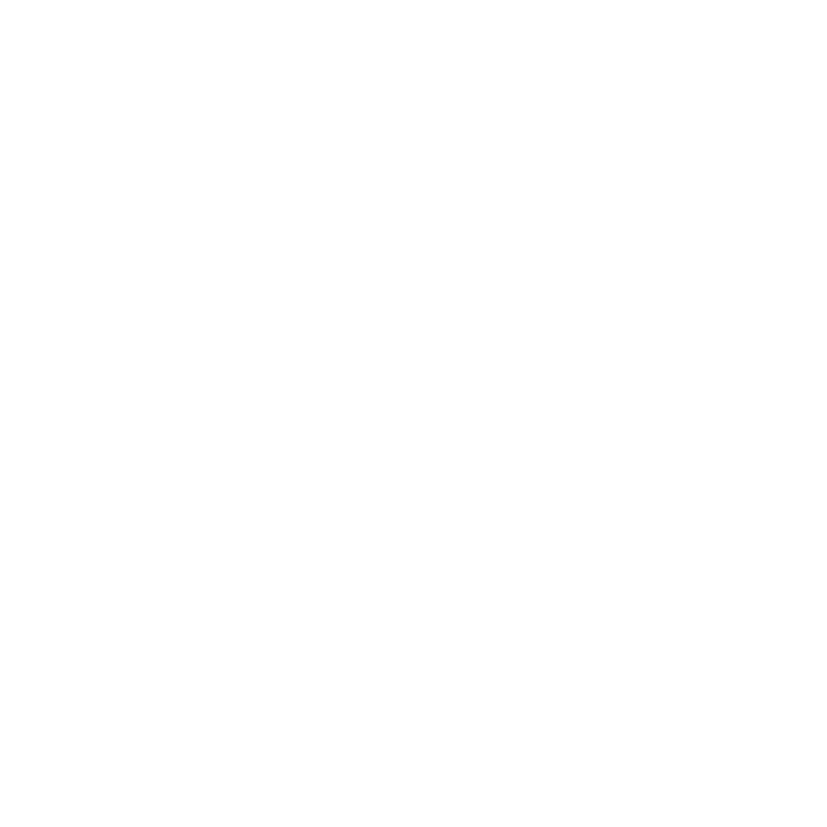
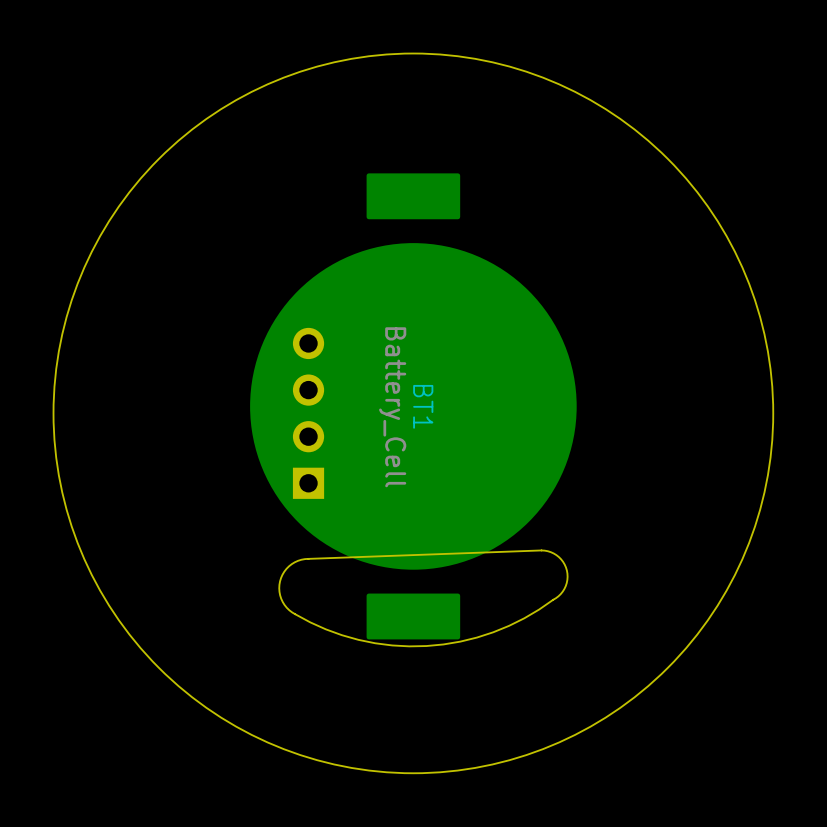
round board edge: none -> [52, 52, 775, 775]
BT1: none -> Battery_Cell (413, 406)
part: none -> (308, 413)
board edge: none -> (541, 550) (304, 559) (294, 562) (286, 568) (280, 581) (279, 591) (282, 602) (292, 612) (341, 635) (392, 645) (443, 644) (476, 637) (509, 625) (558, 596) (566, 583) (565, 567) (556, 555) (541, 550)

